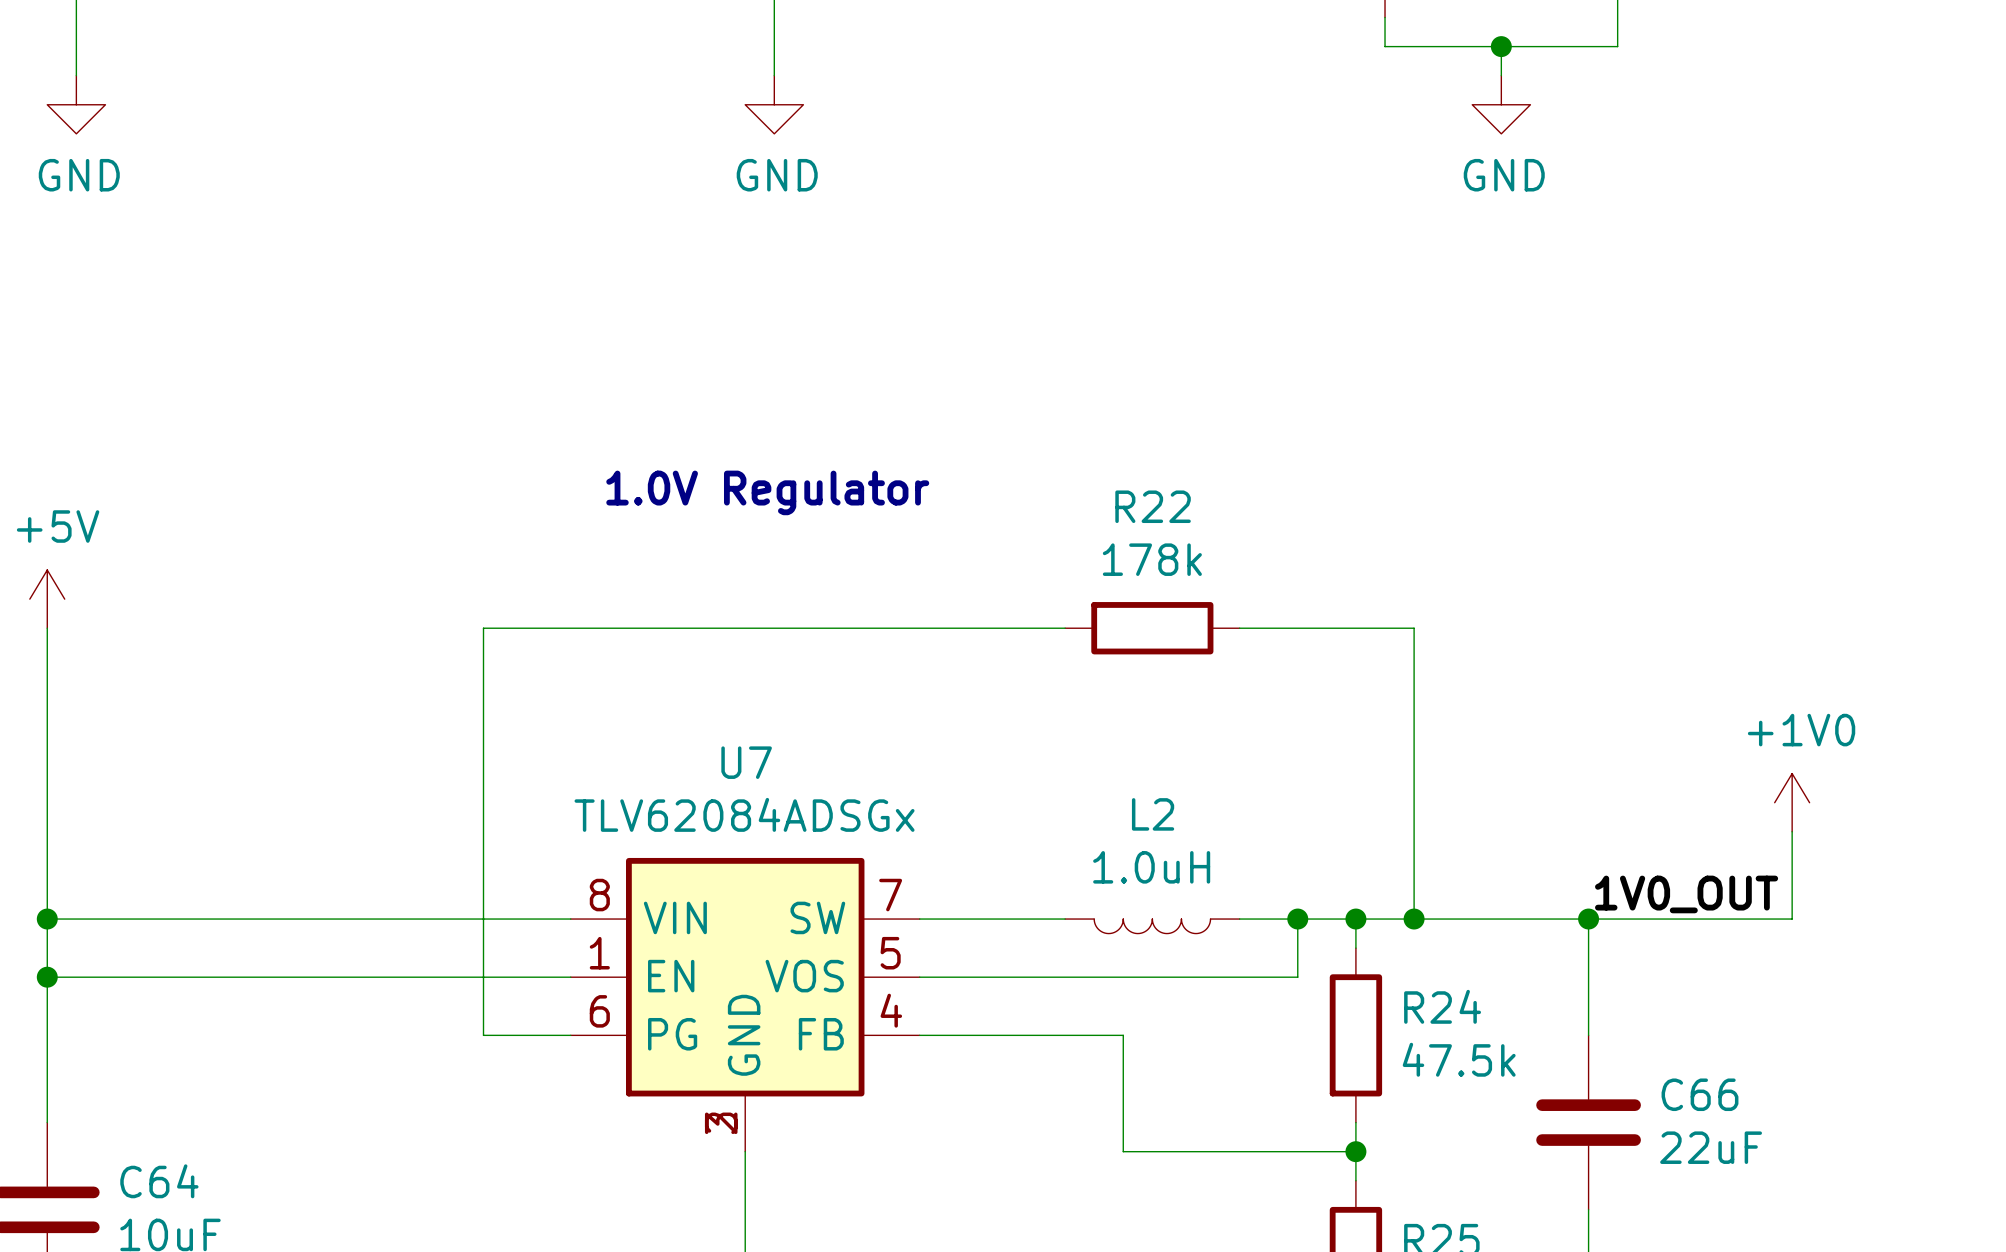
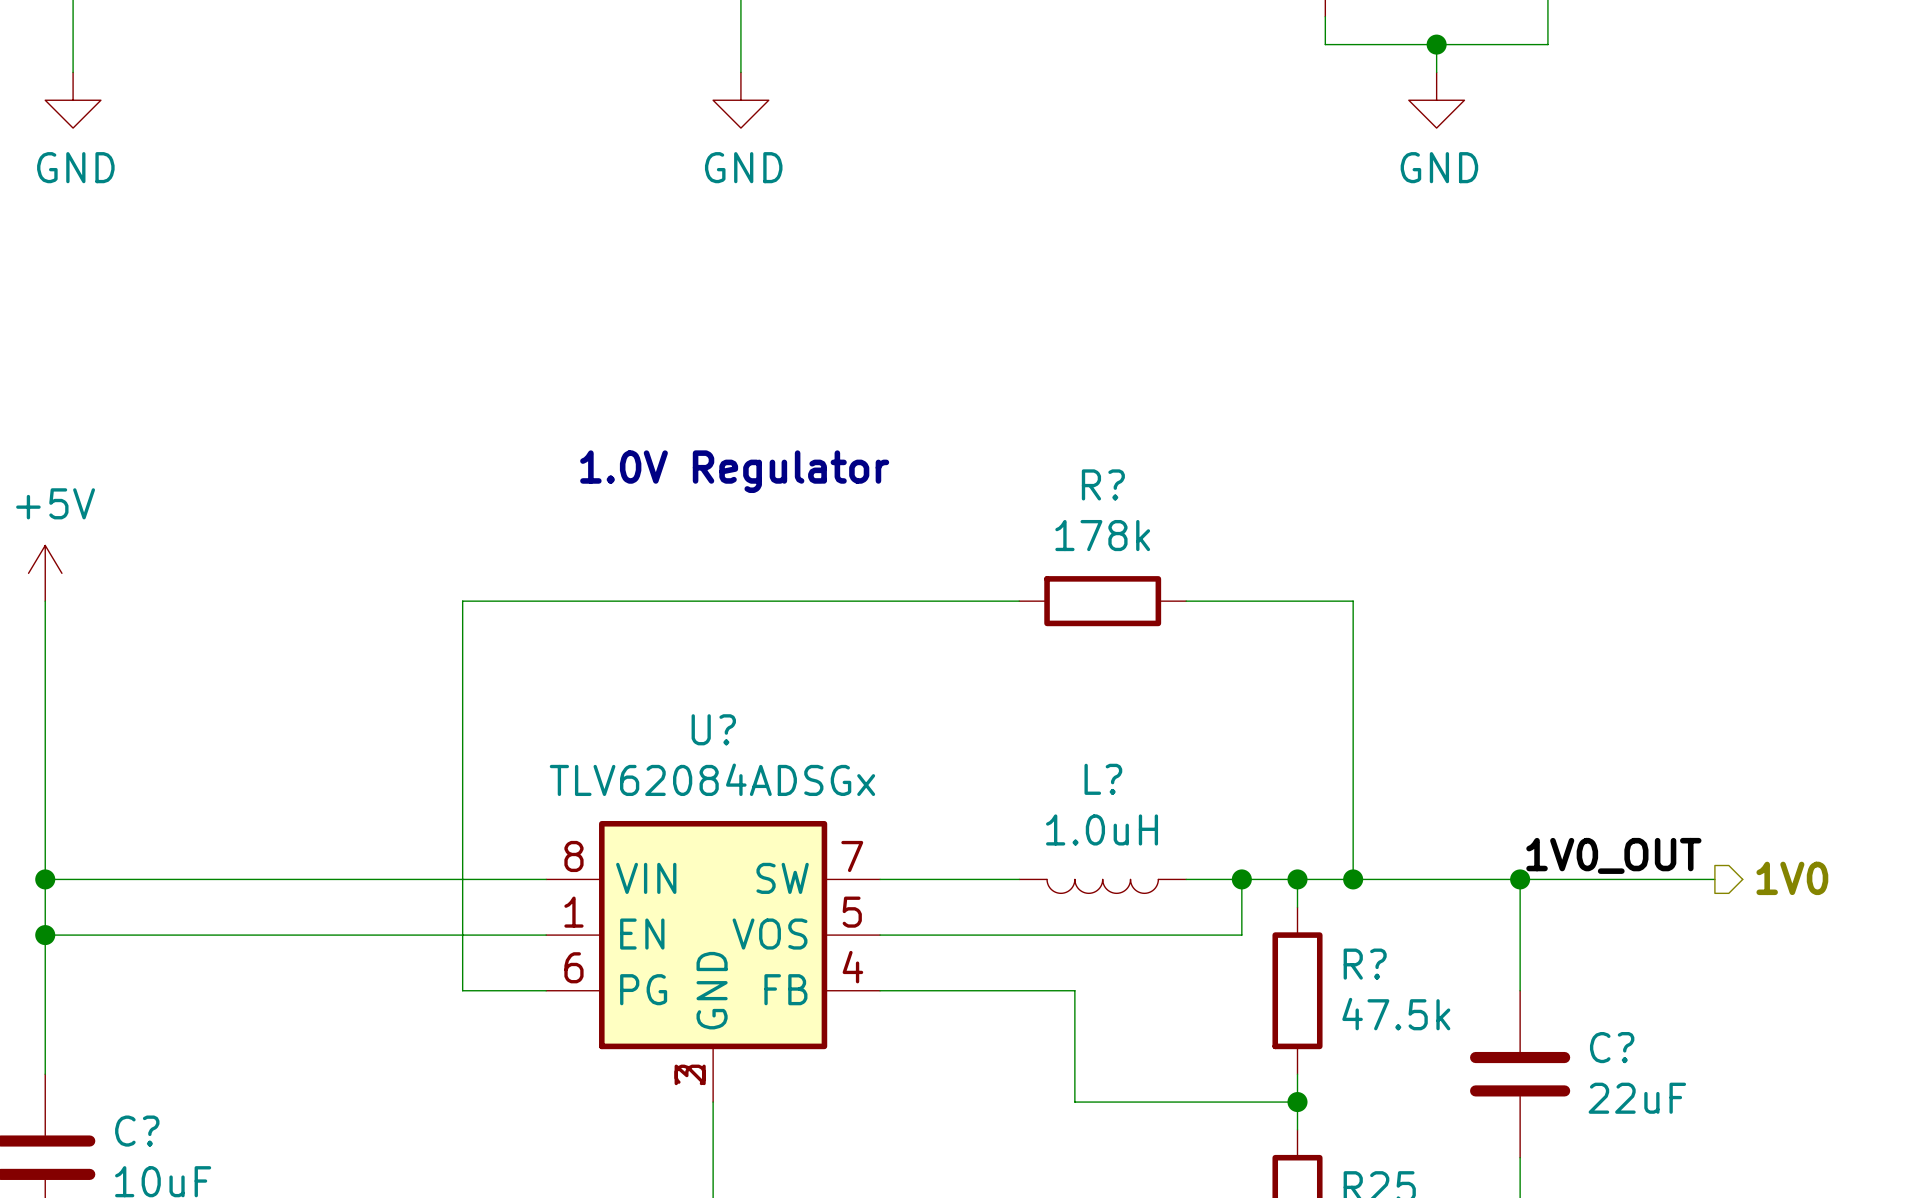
R22 name: R22 (1153, 506) -> R? (1103, 484)
U7 name: U7 (746, 762) -> U? (713, 729)
power symbol: +1V0 (1792, 802) -> none
L2 name: L2 (1153, 814) -> L? (1103, 779)
wire: (1792, 831) (1792, 919) -> none
hierarchical label: none -> 1V0 (1792, 878)
R24 name: R24 (1442, 1006) -> R? (1365, 964)
C66 name: C66 (1699, 1094) -> C? (1612, 1047)
C64 name: C64 (159, 1181) -> C? (137, 1131)

